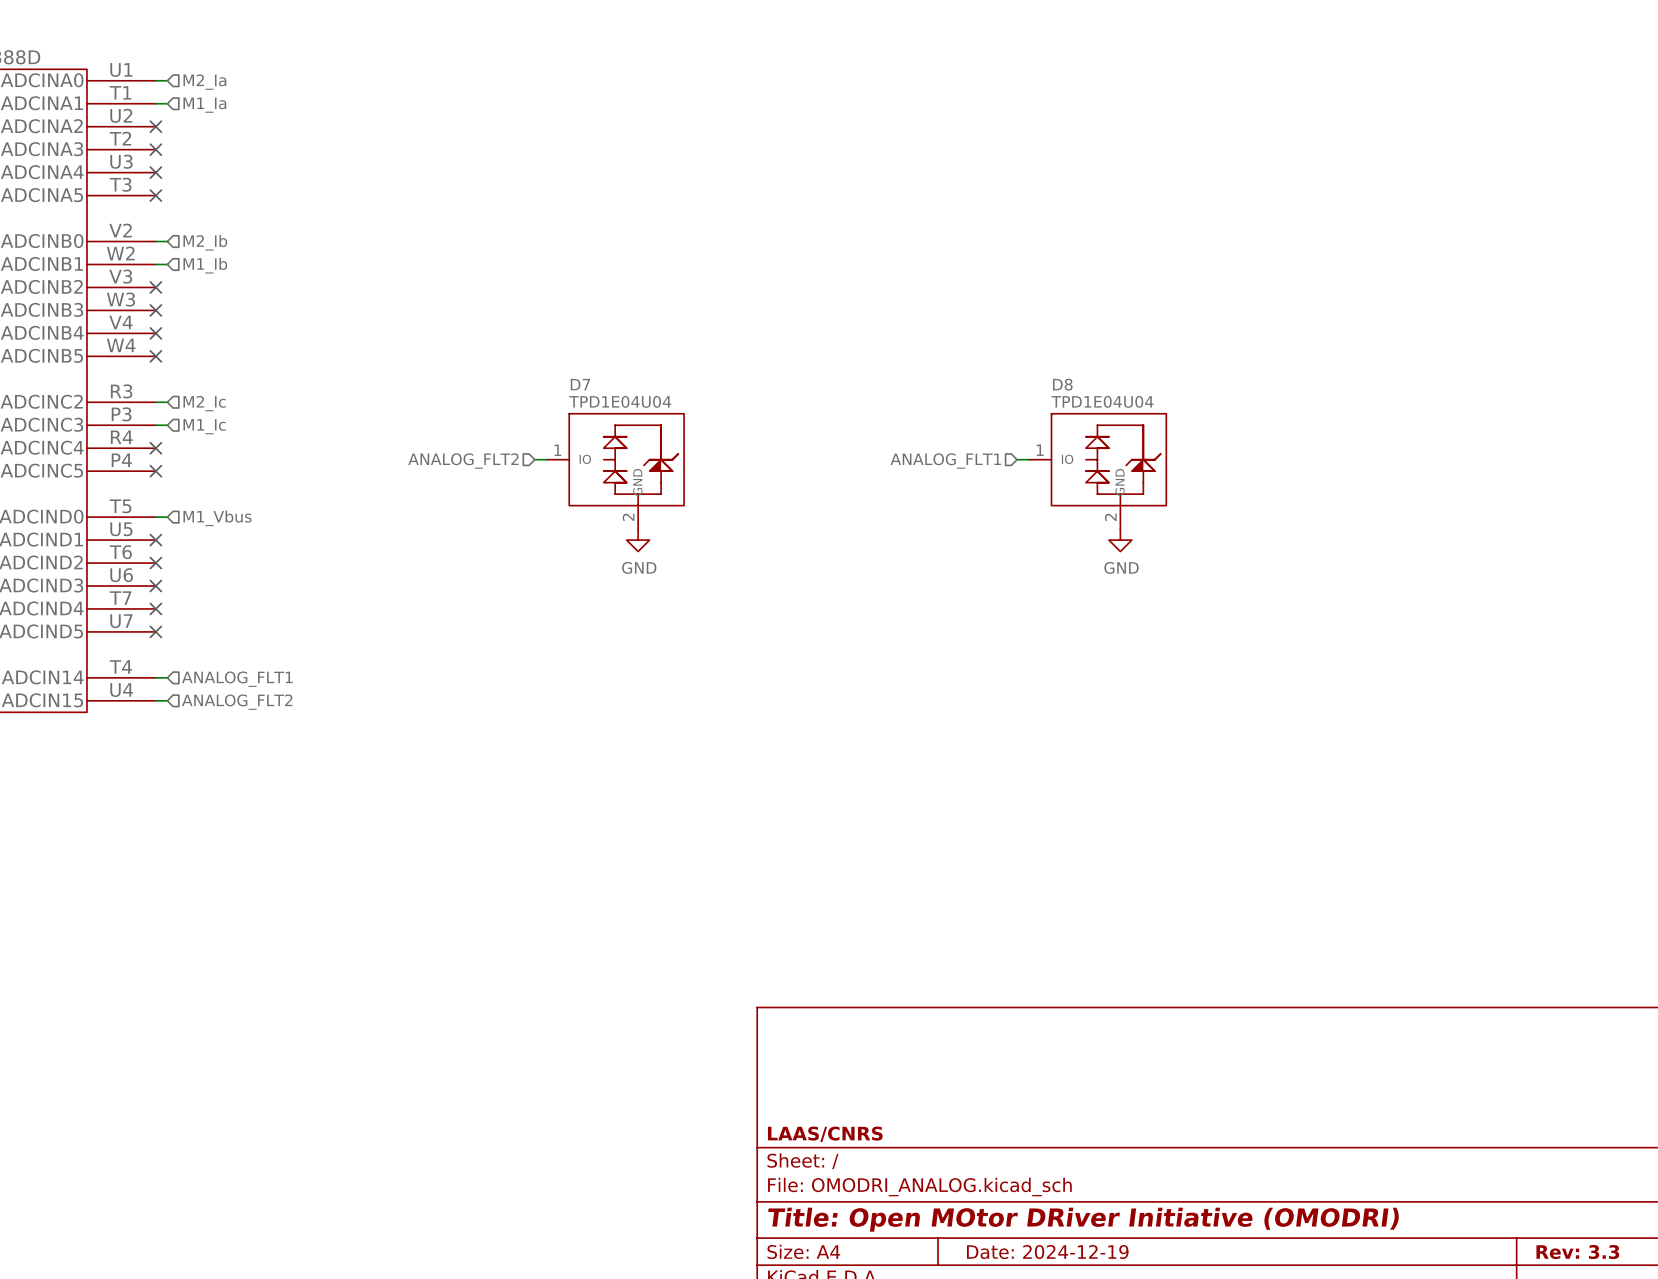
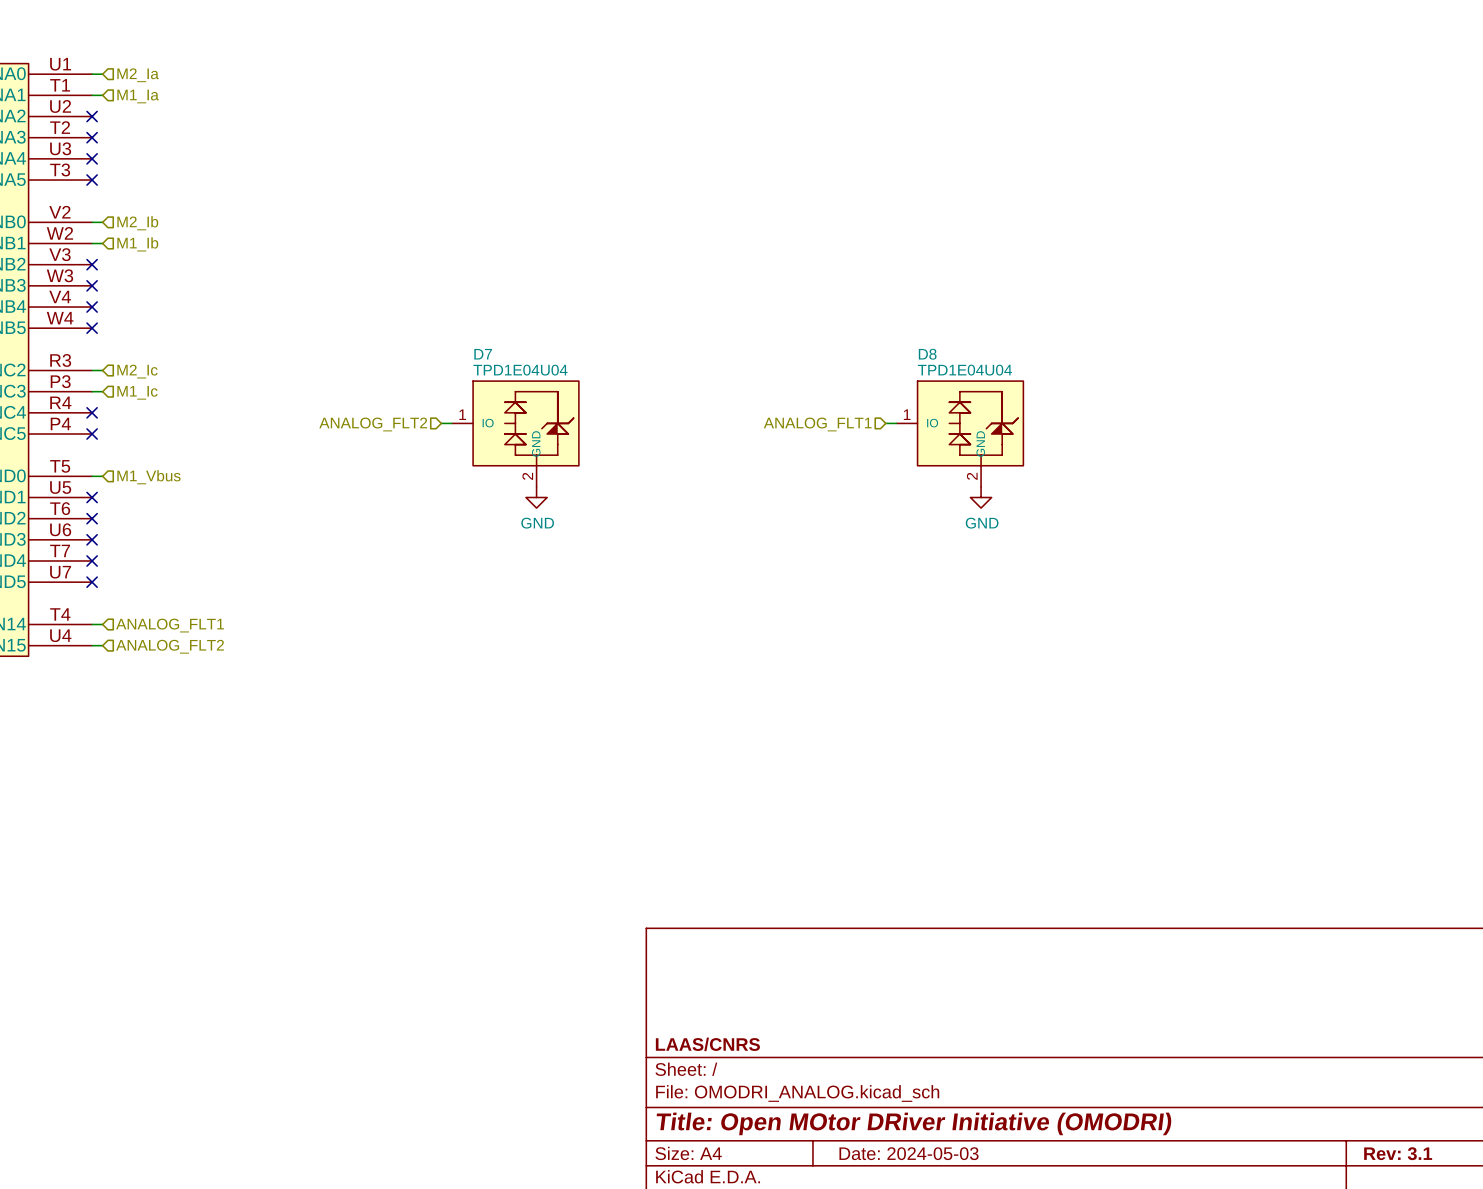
title block: Date: 2024-12-19 (1047, 1252) -> Date: 2024-05-03 (909, 1153)
title block: Rev: 3.3 (1577, 1252) -> Rev: 3.1 (1398, 1153)

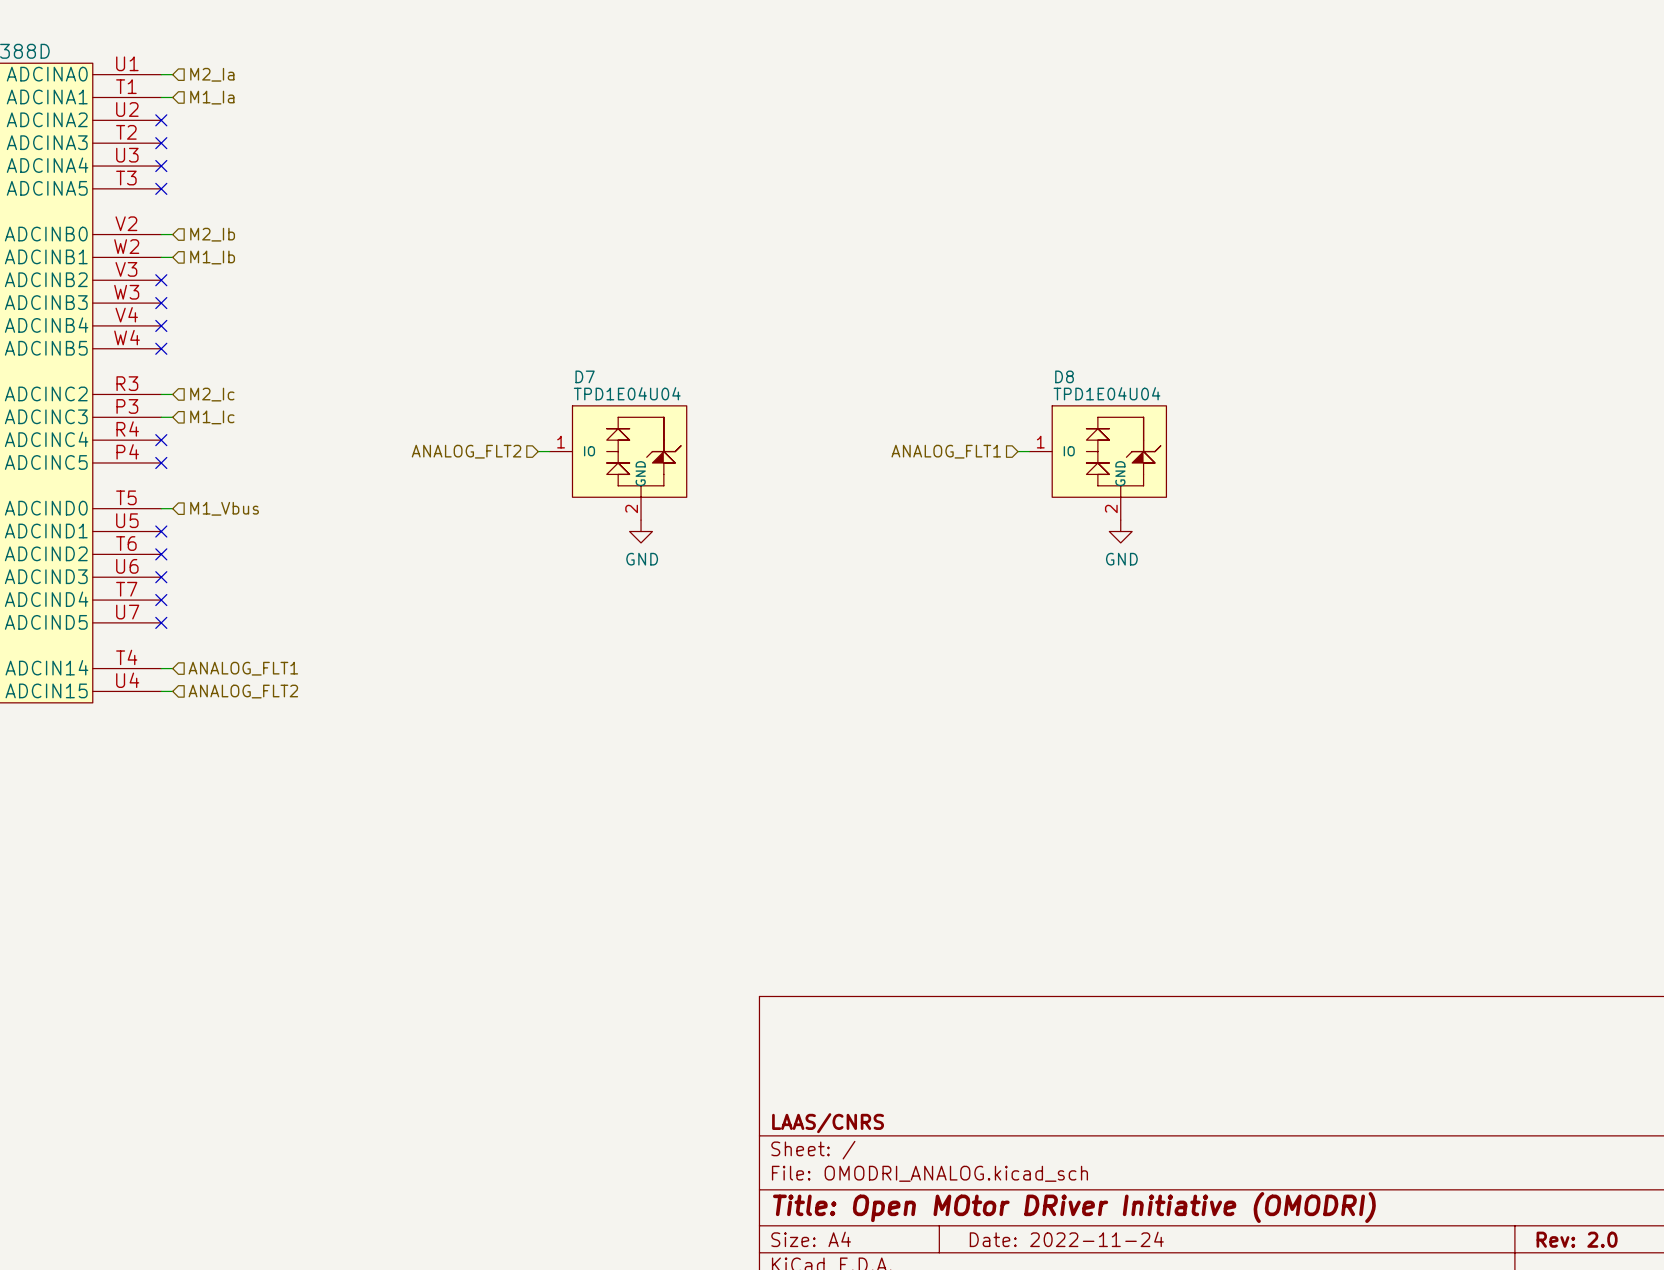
title block: Date: 2024-05-03 (909, 1153) -> Date: 2022-11-24 (1066, 1239)
title block: Rev: 3.1 (1398, 1153) -> Rev: 2.0 (1577, 1239)

